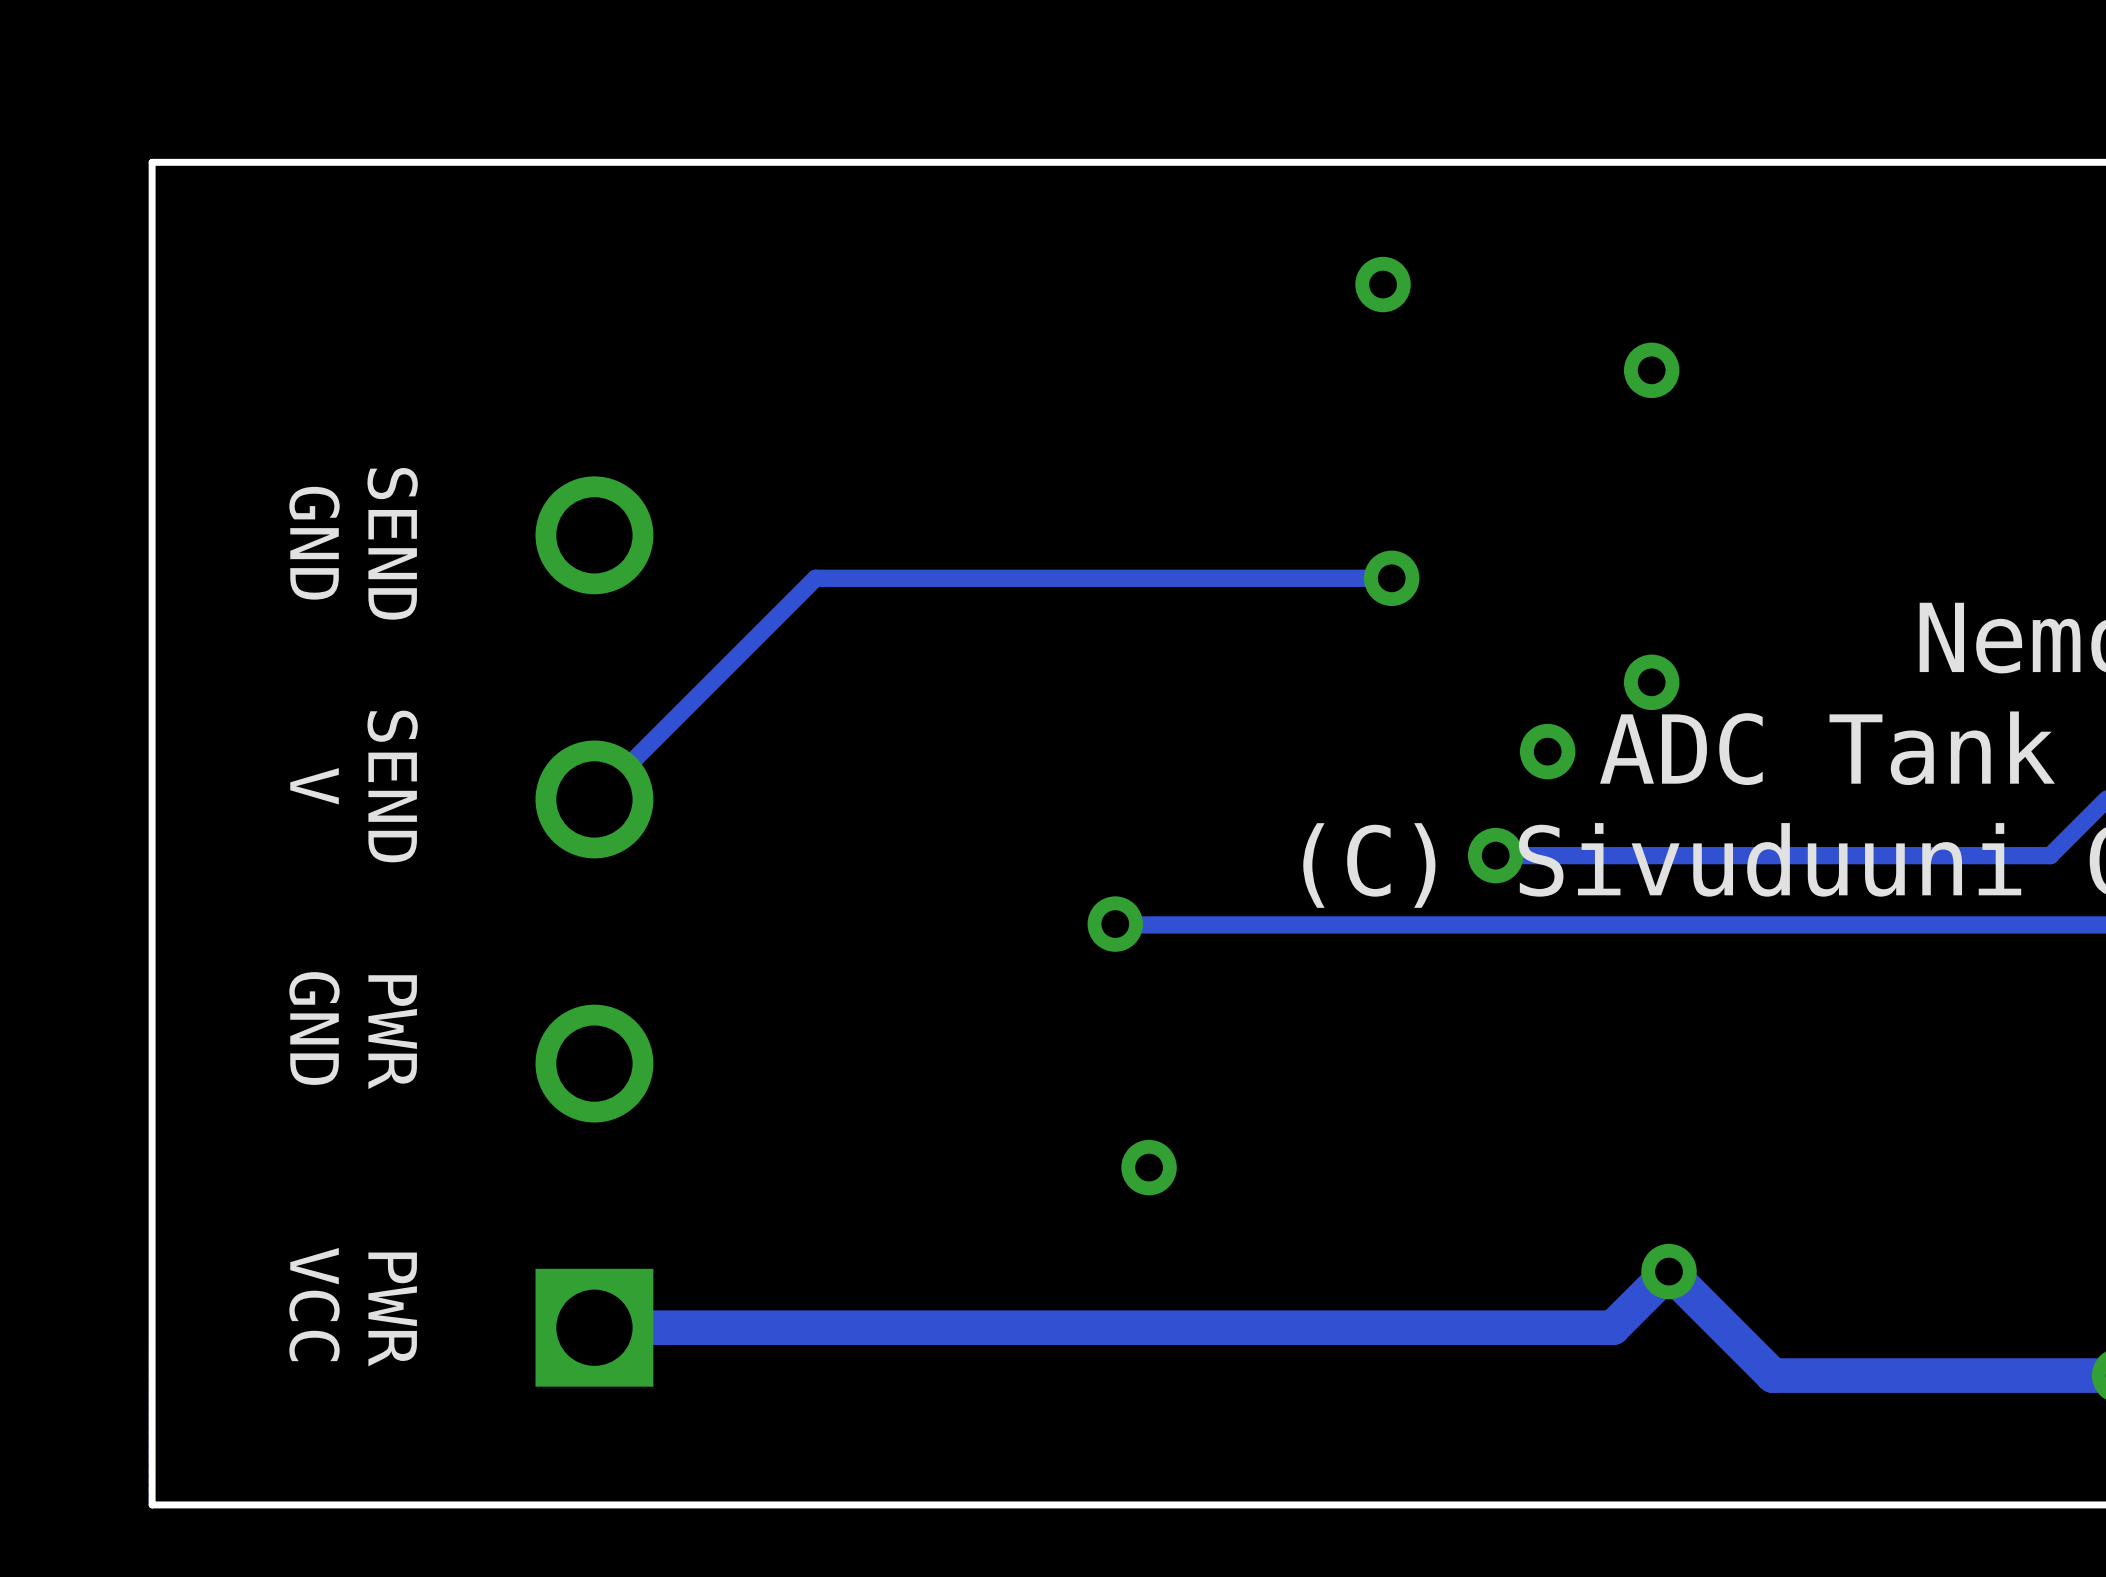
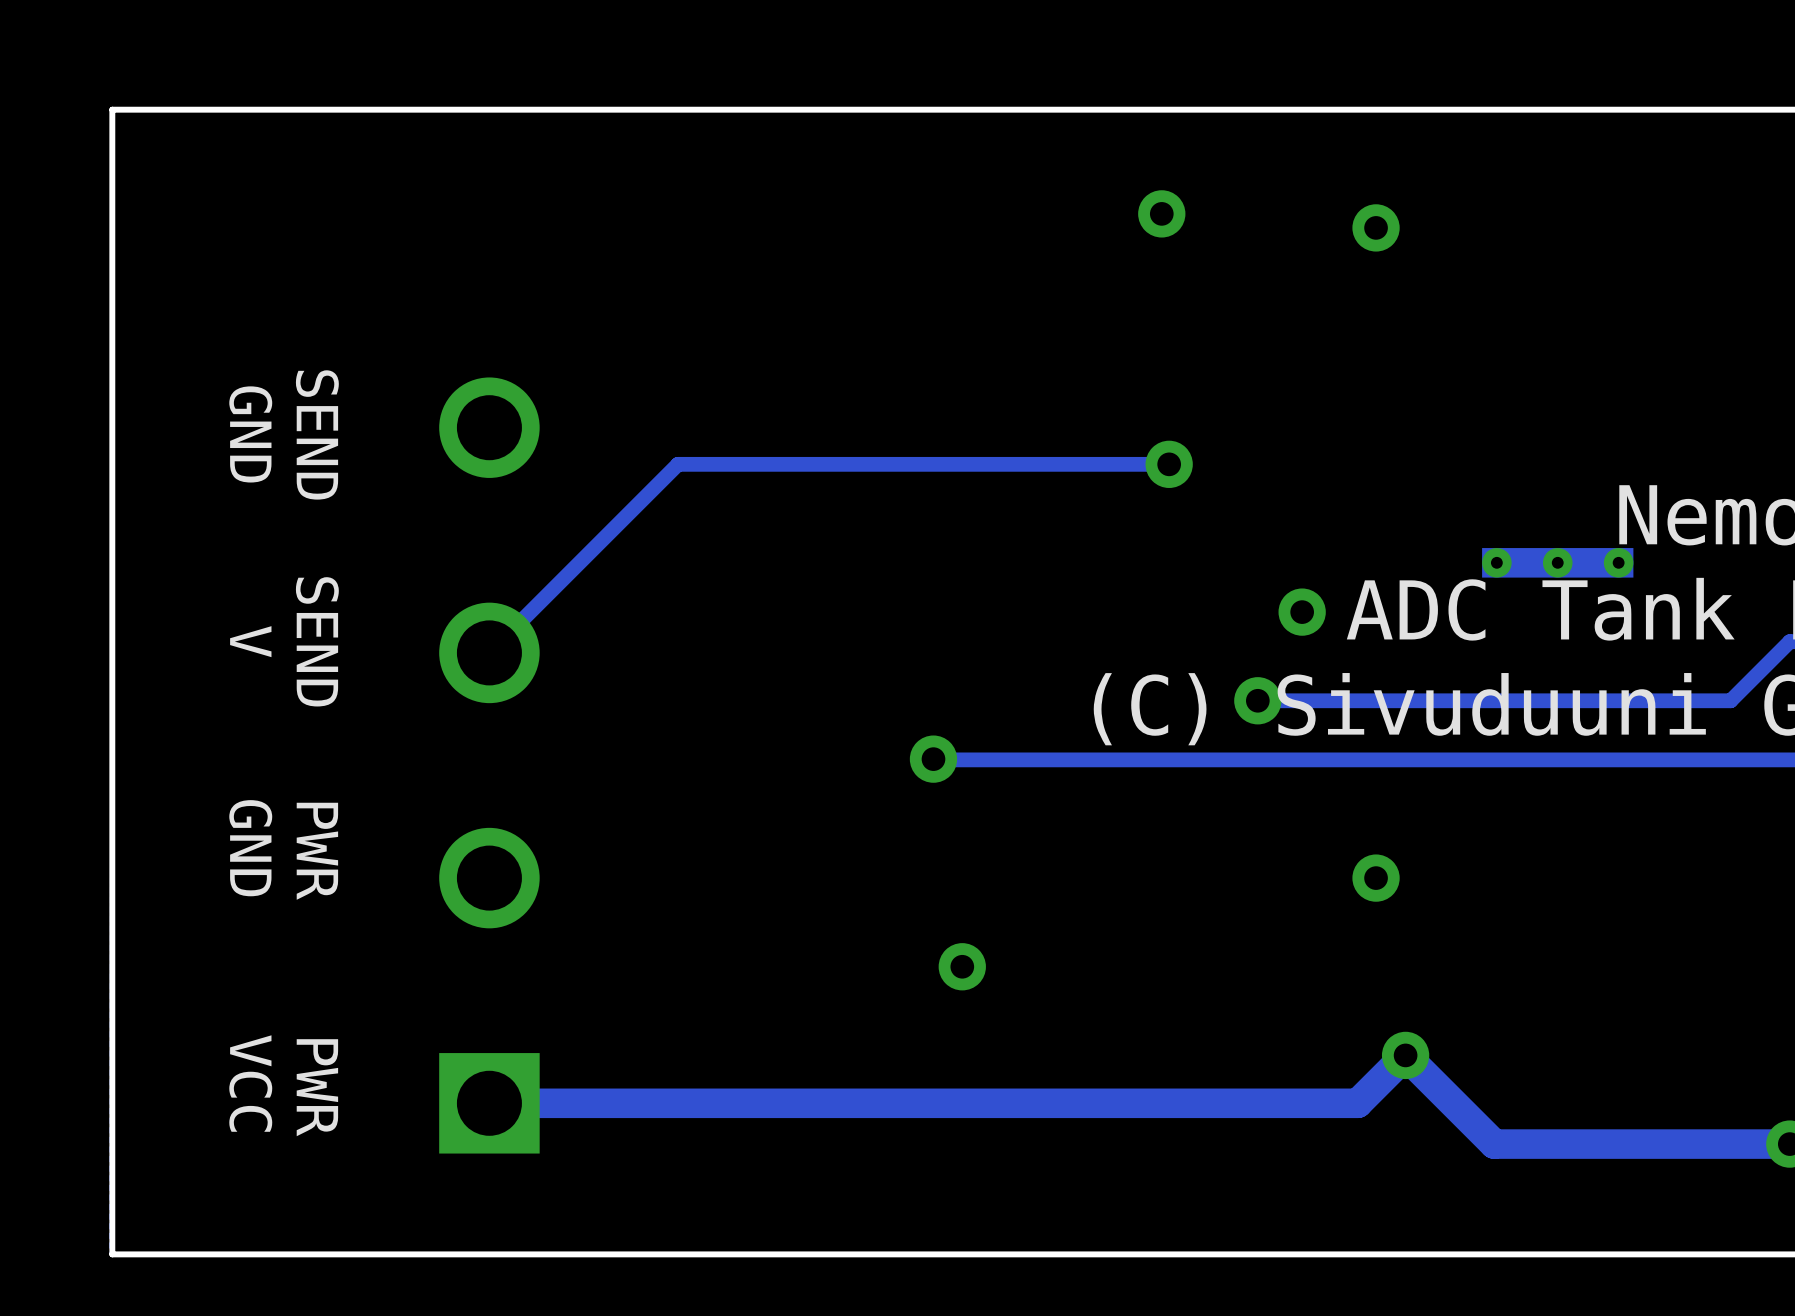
via position: (1651, 370) -> (1376, 227)
via: (1651, 682) -> none
part: none -> (1557, 562)
via: none -> (1376, 878)

